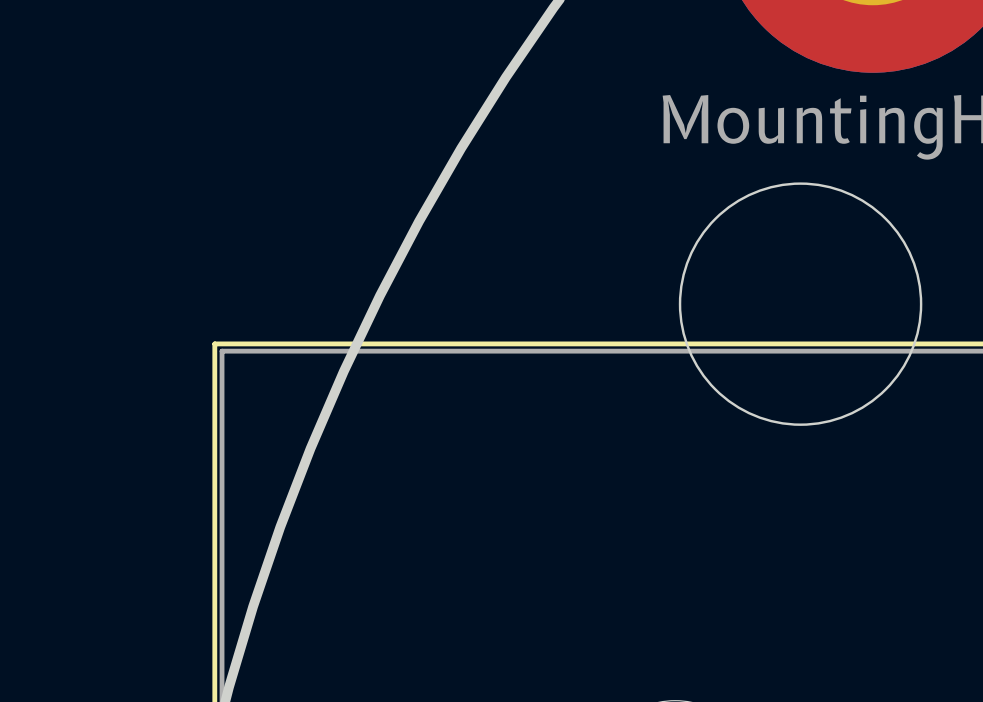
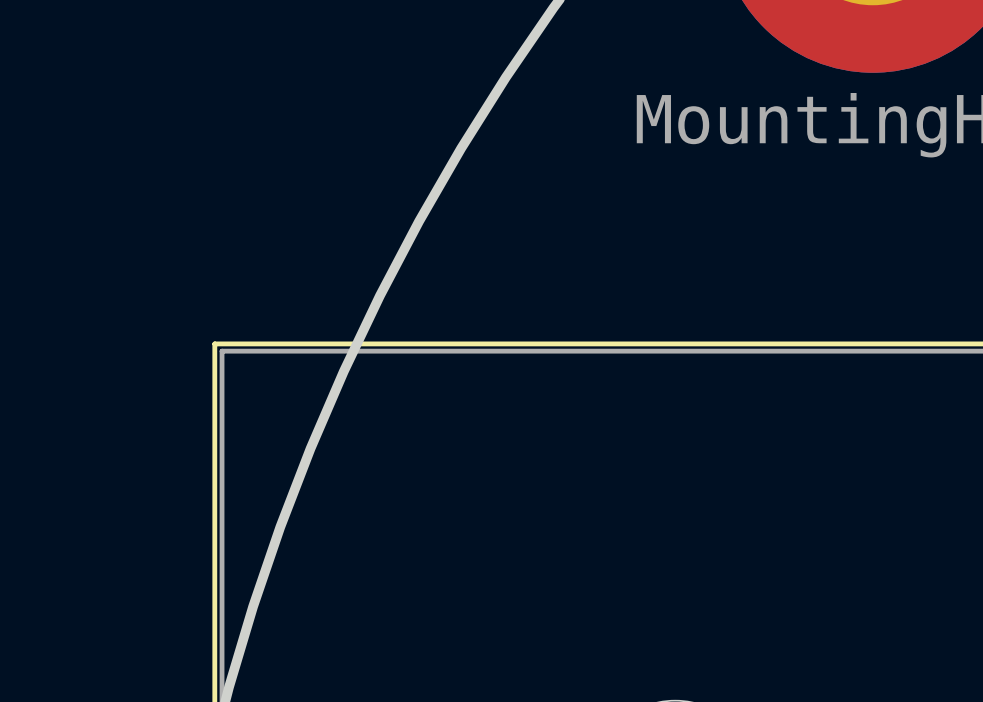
round board edge: [678, 182, 923, 426] -> none

